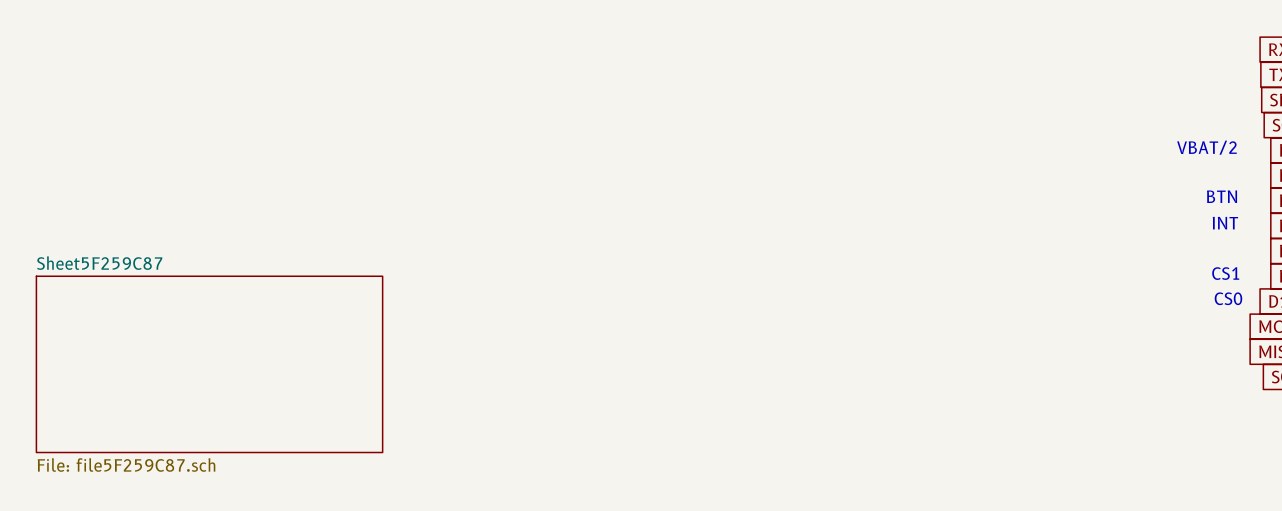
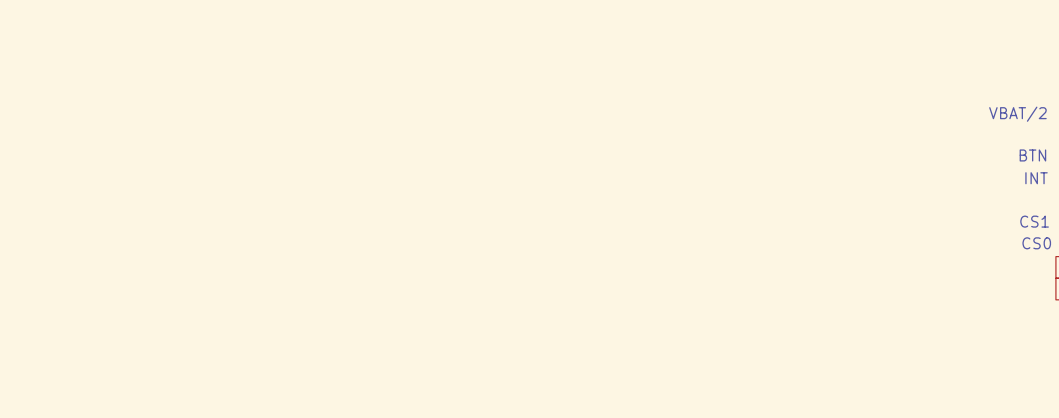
sheet Sheet5F259C87: File: file5F259C87.sch (209, 364) -> none

